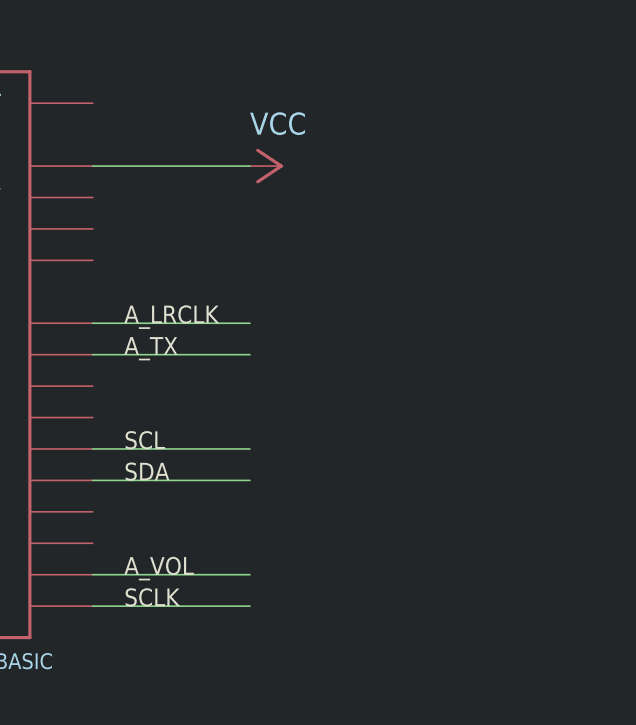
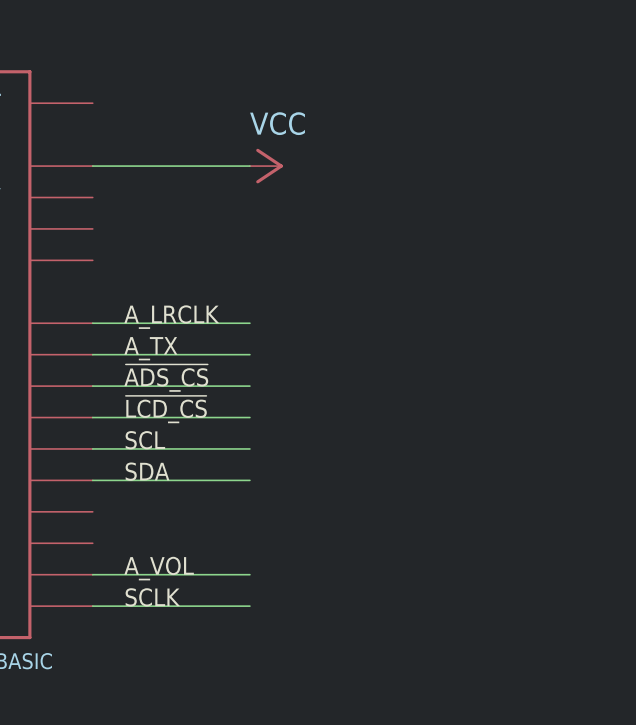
label: none -> ~{ADS_CS} (166, 378)
wire: none -> (92, 386) (249, 386)
label: none -> ~{LCD_CS} (166, 409)
wire: none -> (92, 417) (249, 417)

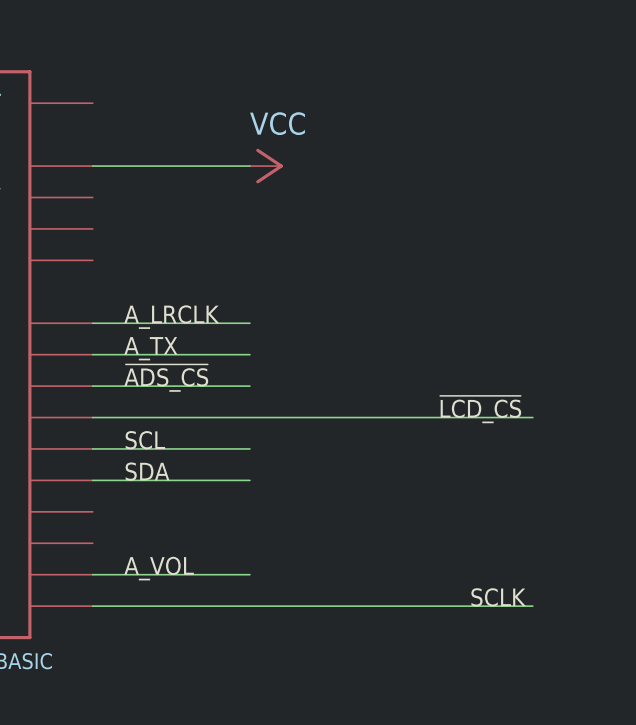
label: ~{LCD_CS} (166, 409) -> none
label: none -> ~{LCD_CS} (480, 409)
wire: none -> (249, 417) (532, 417)
label: SCLK (152, 597) -> none
label: none -> SCLK (498, 597)
wire: none -> (249, 606) (532, 606)

